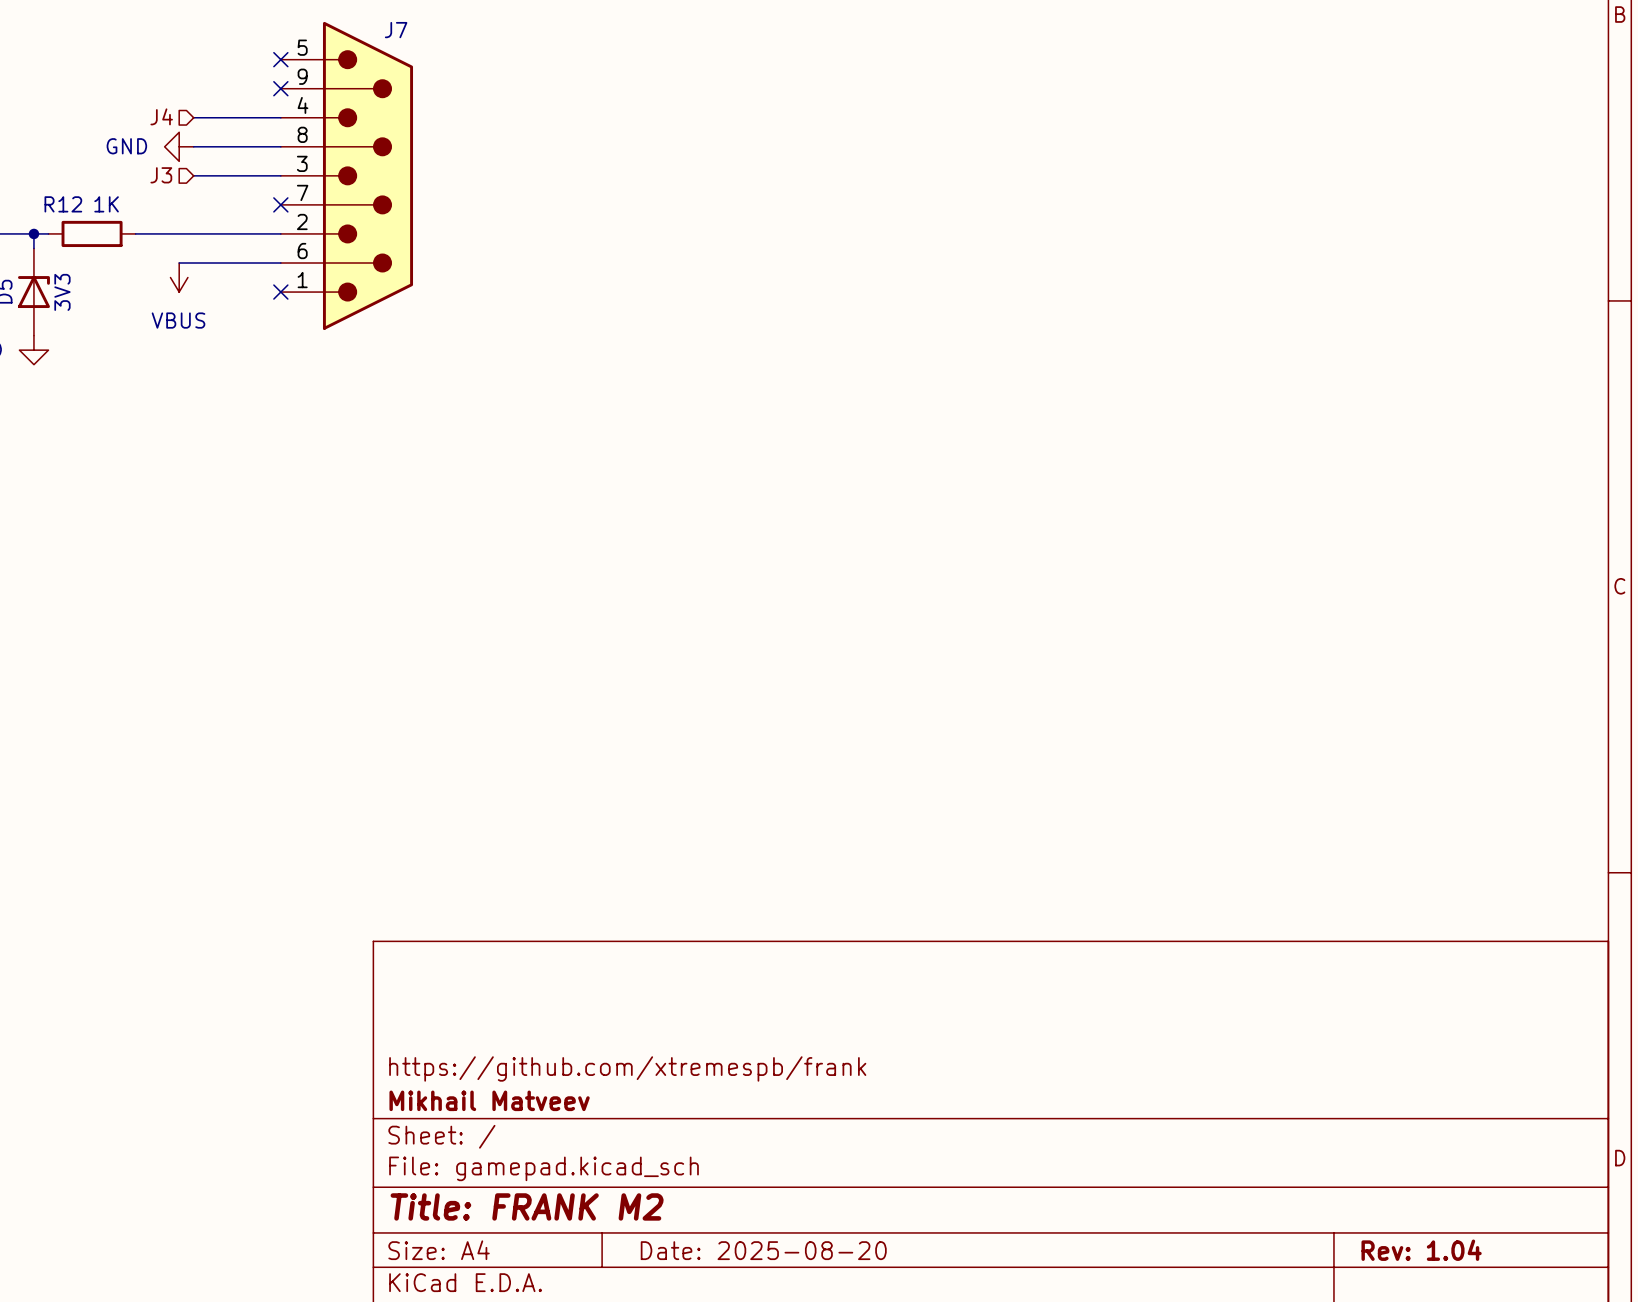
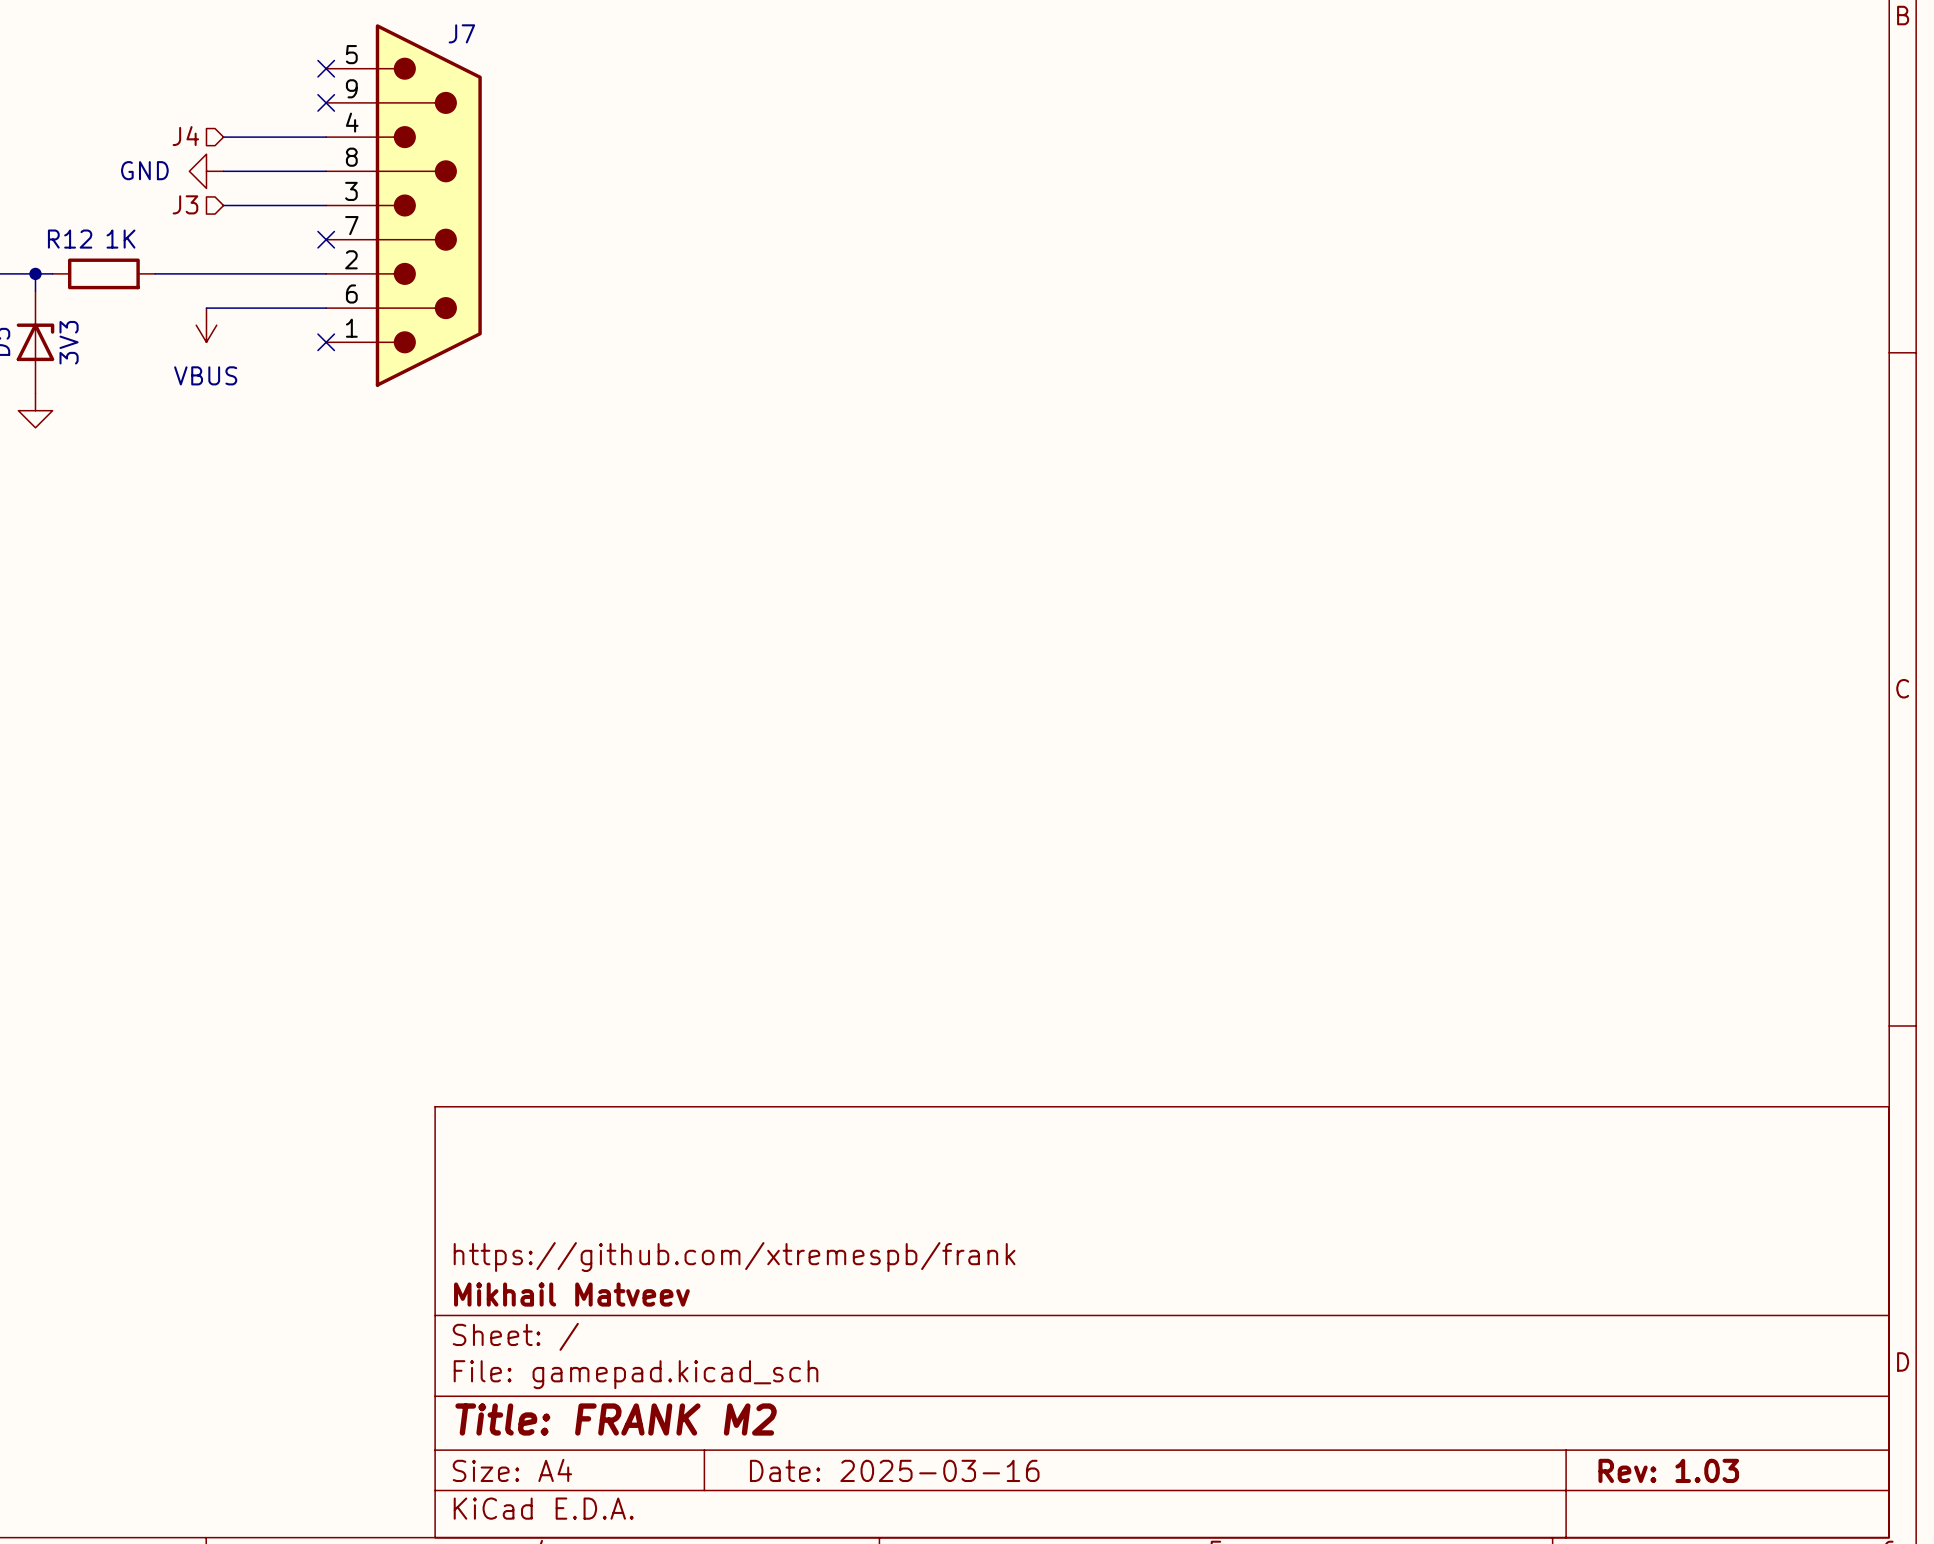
title block: Date: 2025-08-20 (763, 1250) -> Date: 2025-03-16 (894, 1470)
title block: Rev: 1.04 (1421, 1250) -> Rev: 1.03 (1668, 1470)

